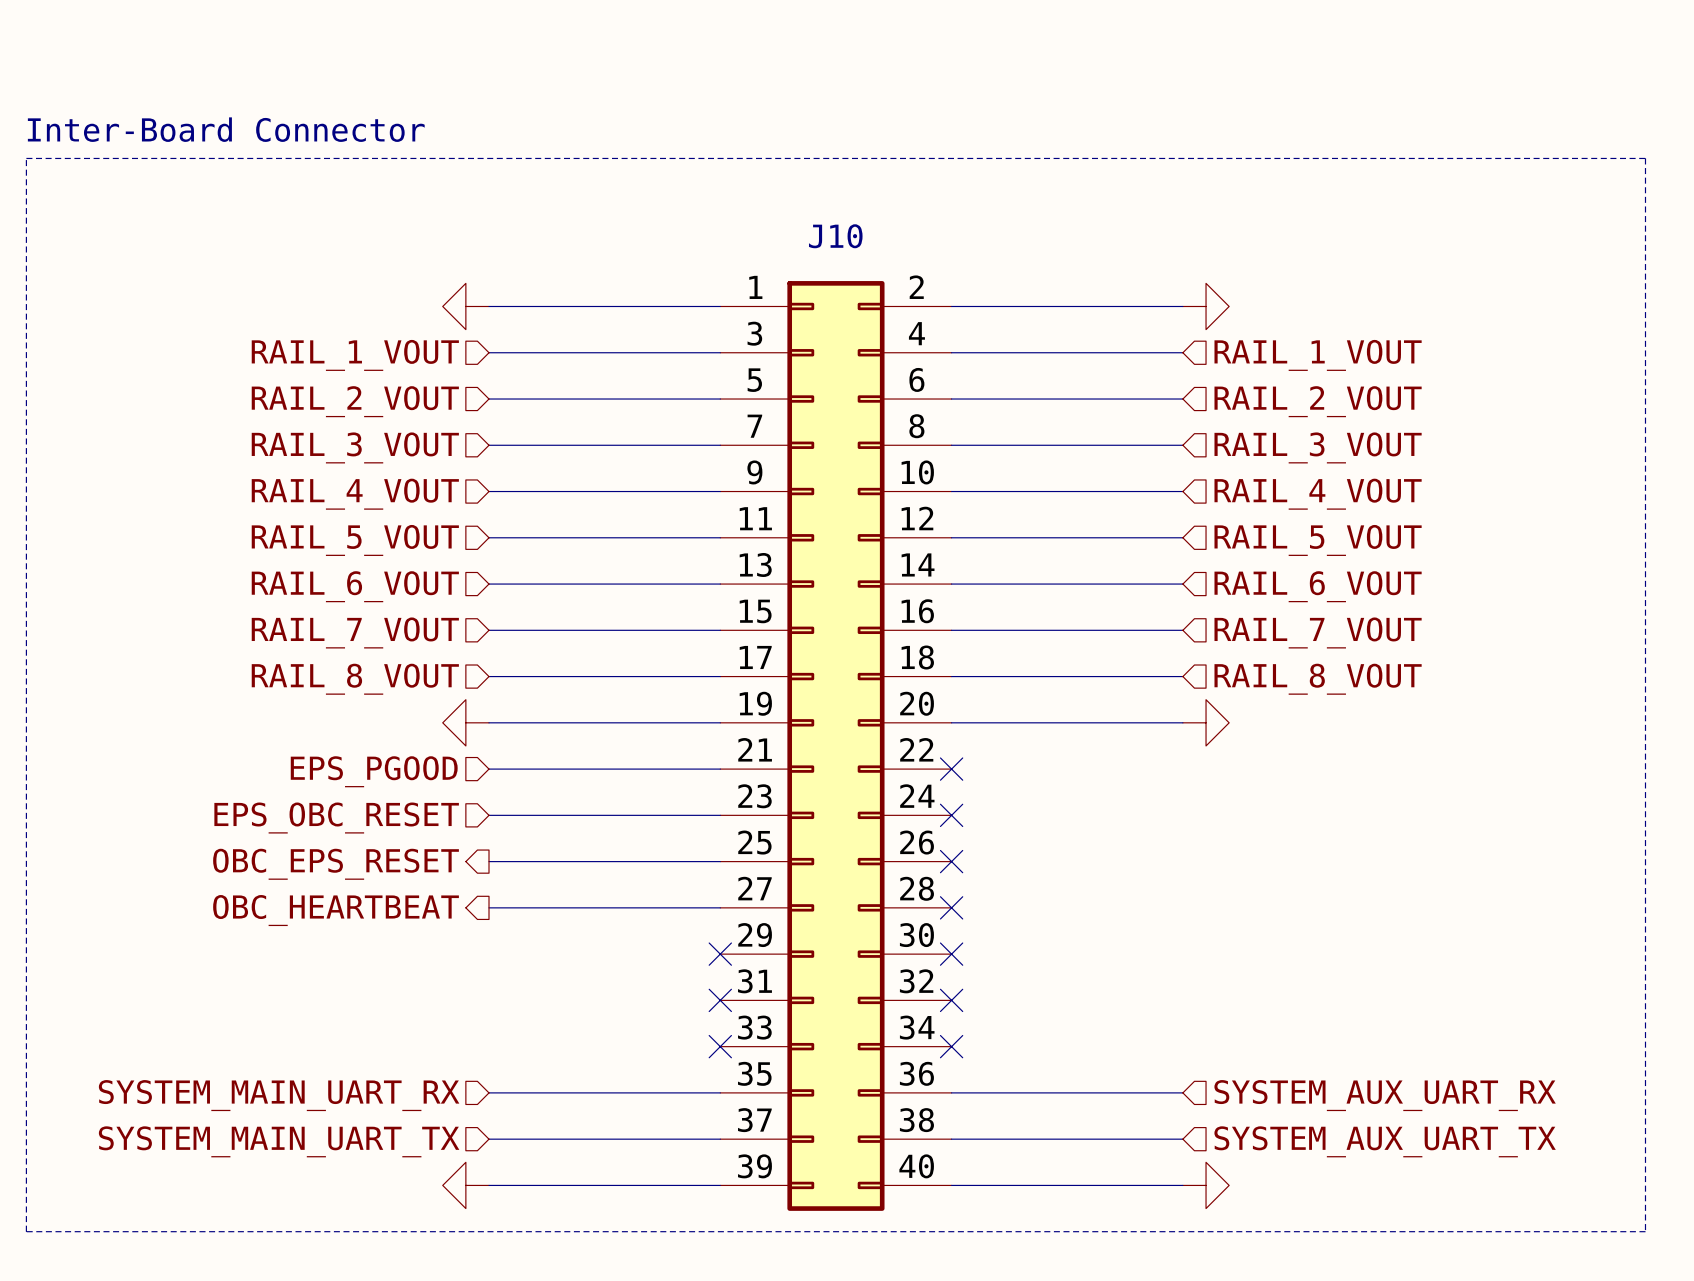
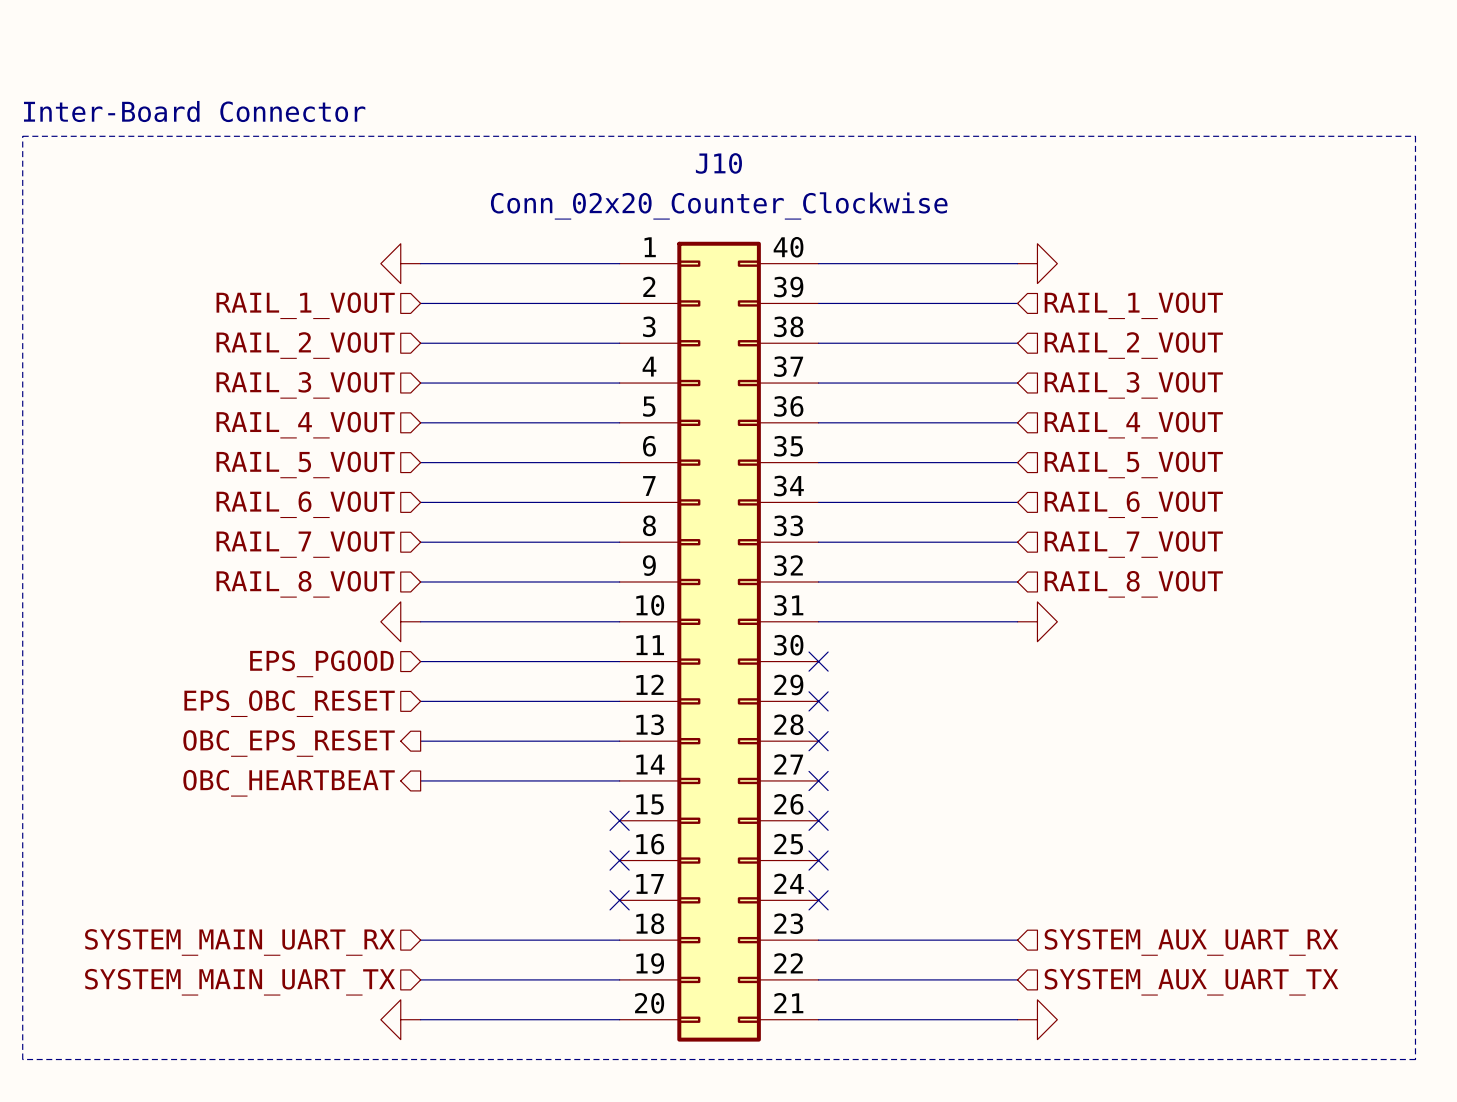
J10 name position: J10 (835, 236) -> J10 (718, 163)
J10 value: none -> Conn_02x20_Counter_Clockwise (719, 205)
J10 symbol: [720, 281, 952, 1211] -> [619, 241, 819, 1042]

